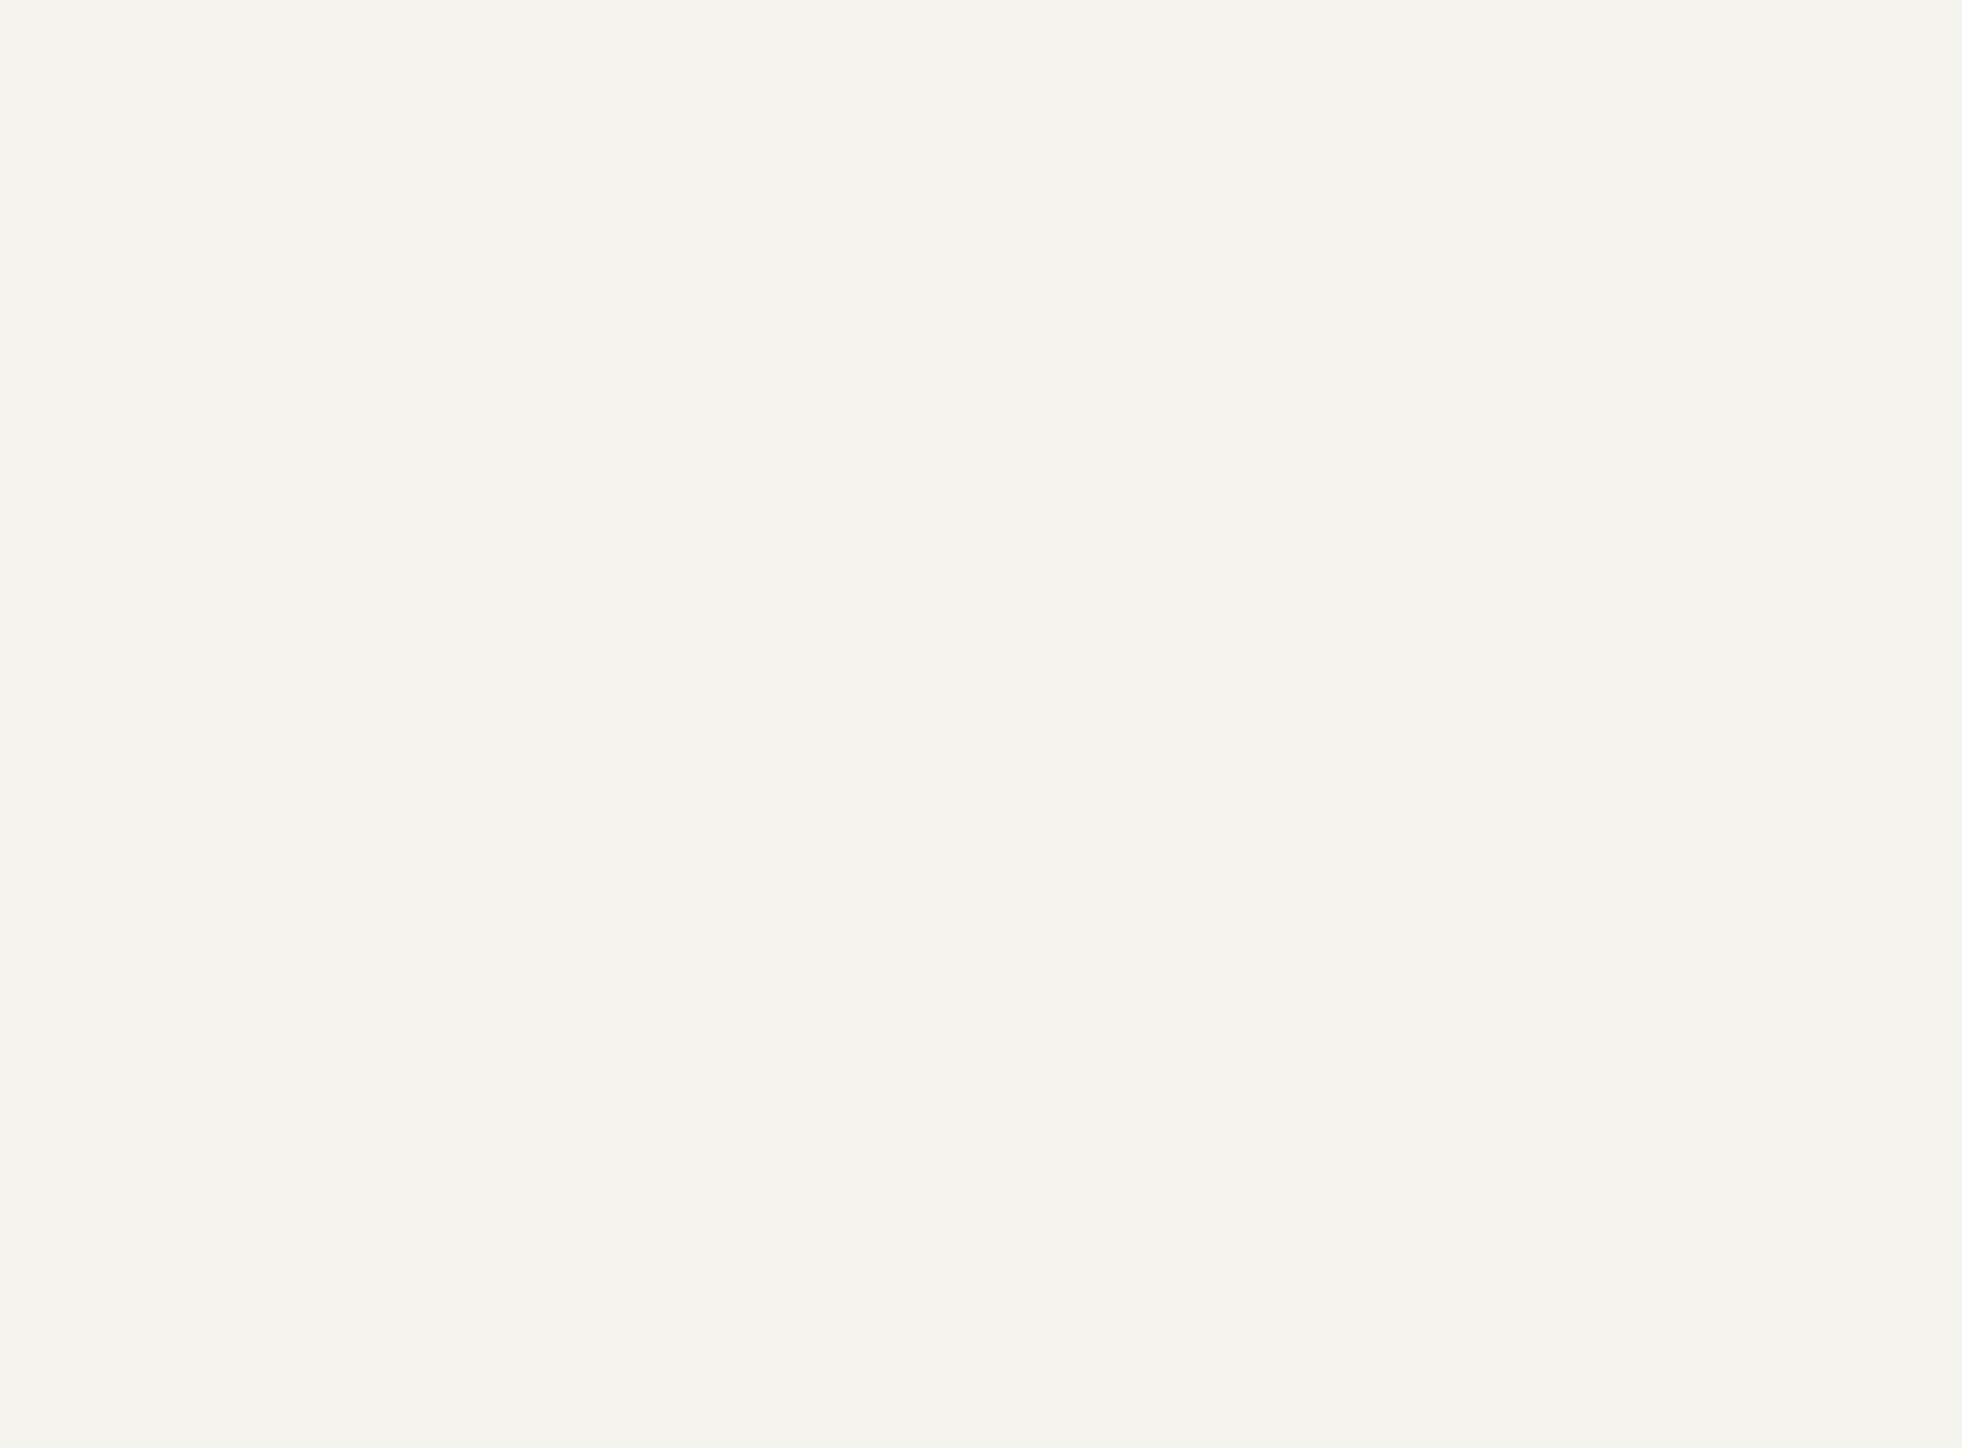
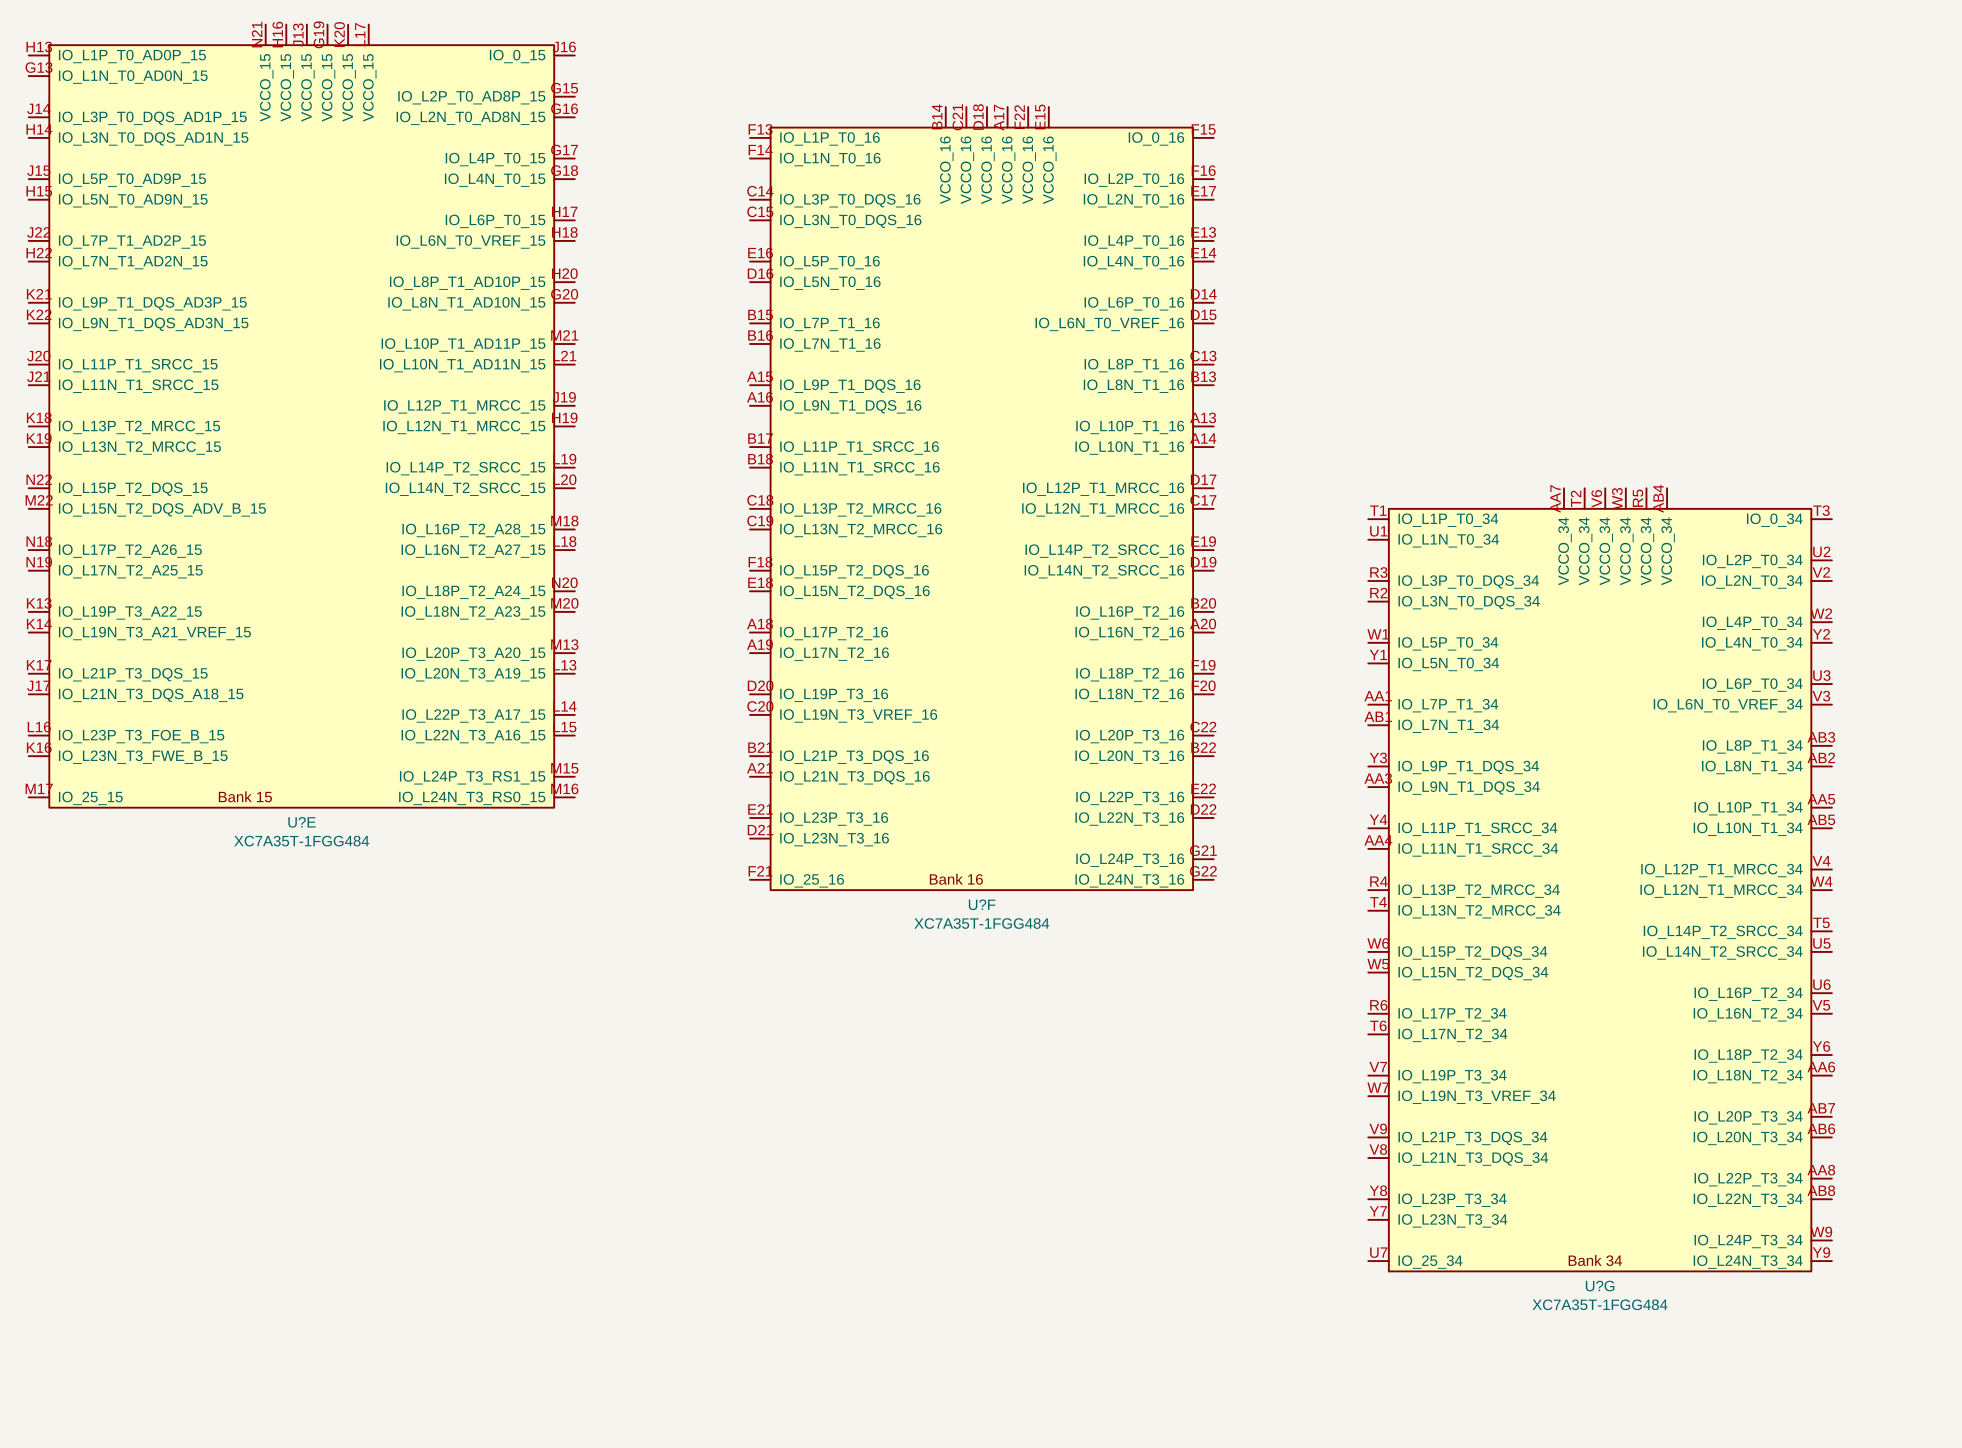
U?E: none -> XC7A35T-1FGG484 (301, 416)
U?F: none -> XC7A35T-1FGG484 (981, 498)
U?G: none -> XC7A35T-1FGG484 (1600, 879)

